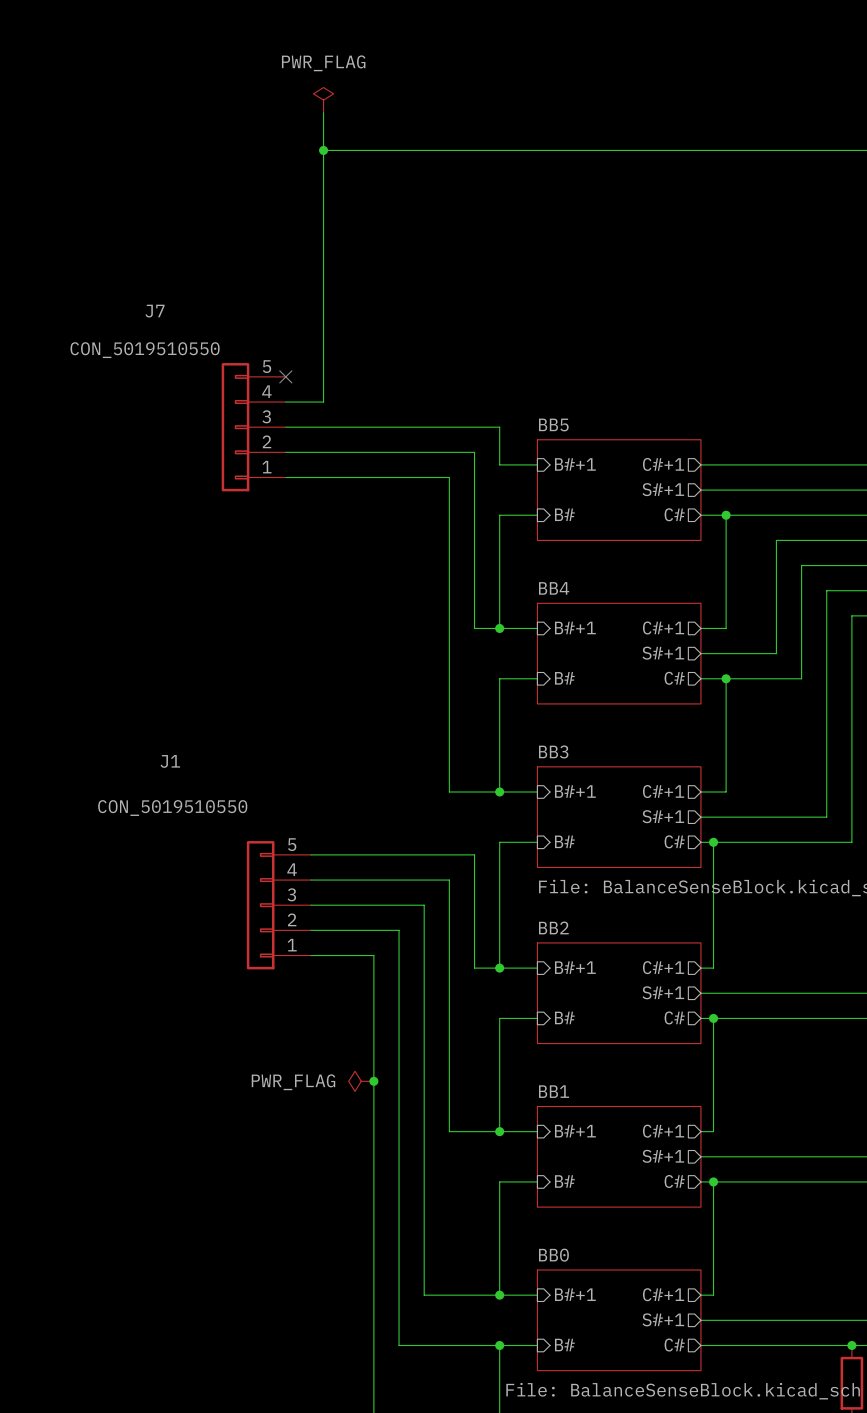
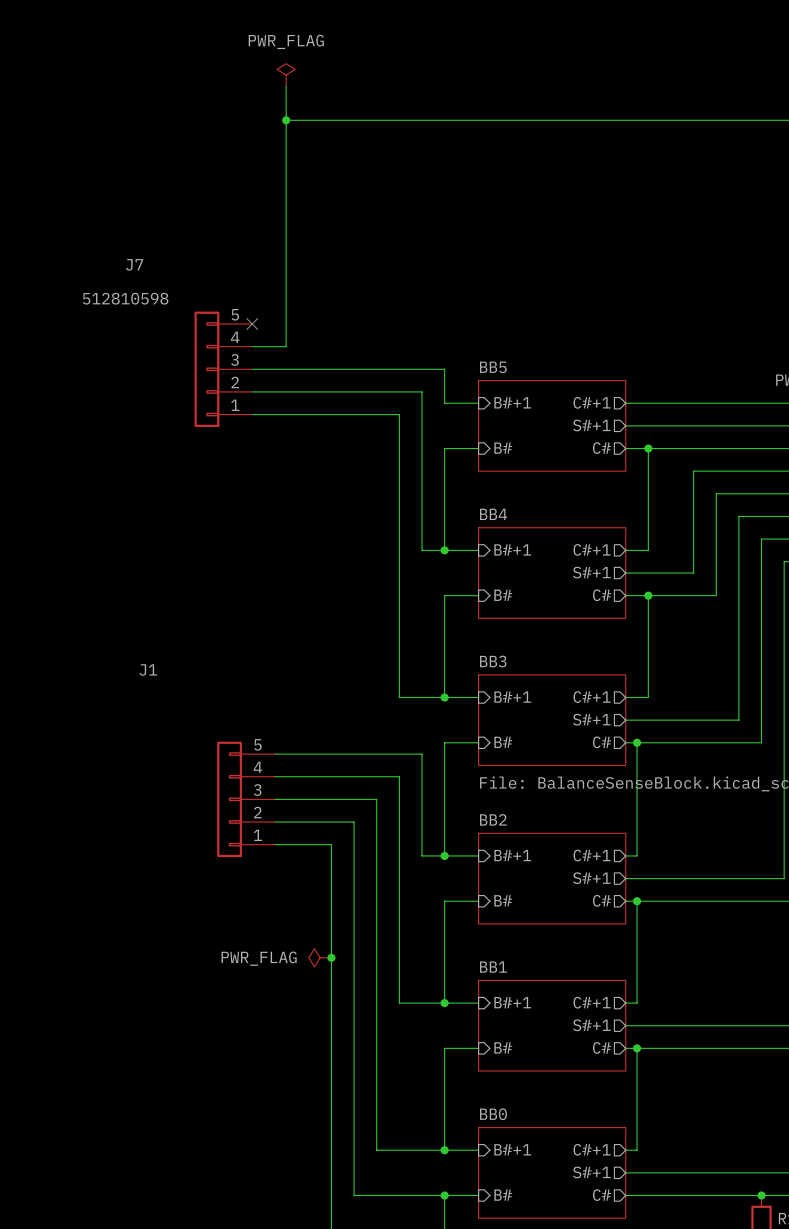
J7 value: CON_5019510550 (145, 350) -> 512810598 (125, 298)
J1 value: CON_5019510550 (172, 808) -> none

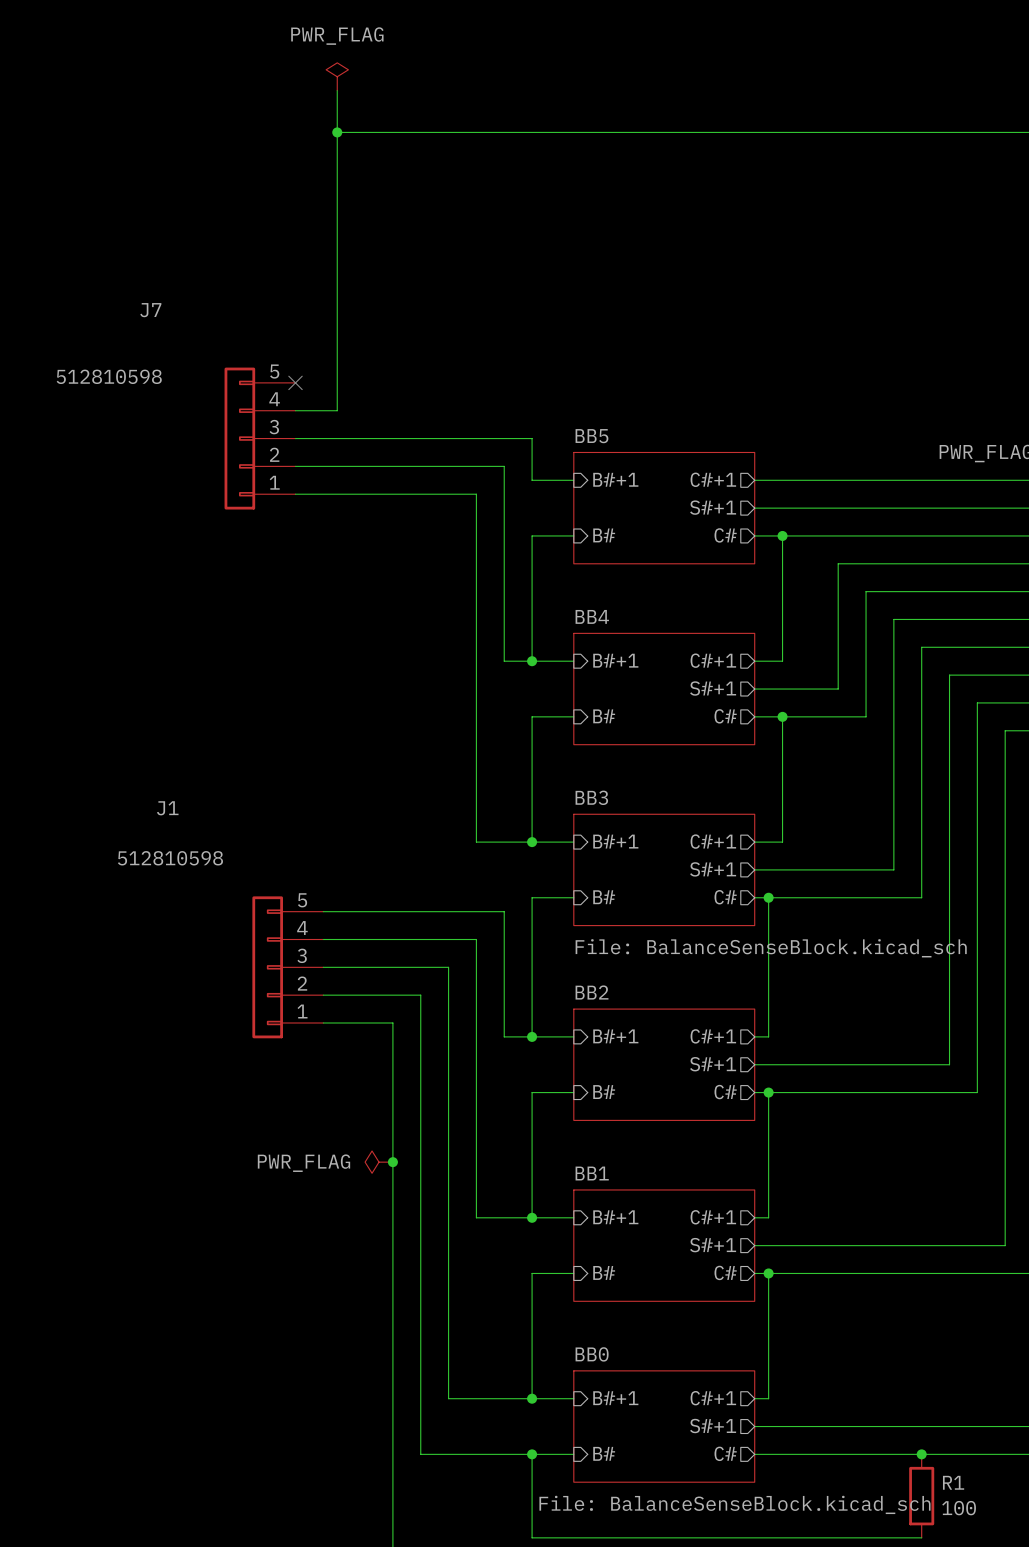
J7 value position: 512810598 (125, 298) -> 512810598 (109, 376)
J1 value: none -> 512810598 (170, 858)

